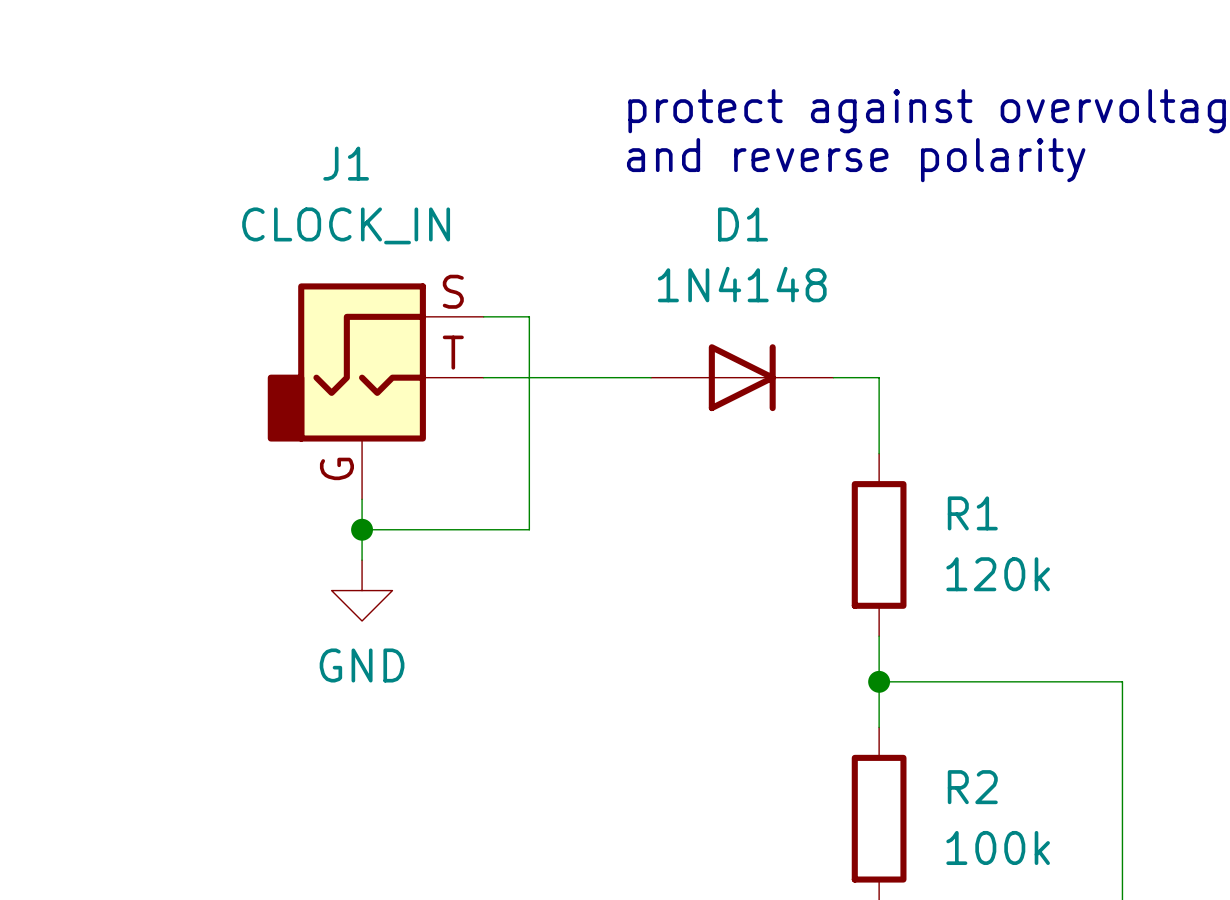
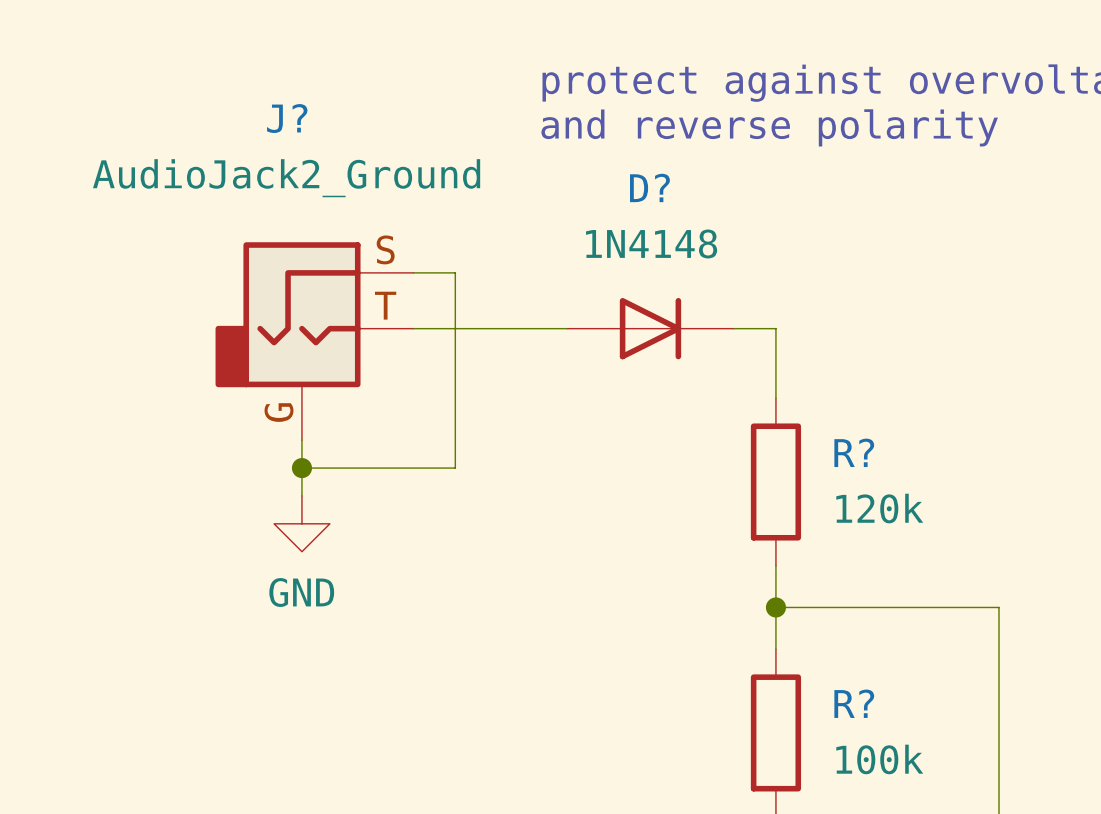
J1 name: J1 (346, 163) -> J? (287, 118)
D1 name: D1 (742, 224) -> D? (649, 187)
J1 value: CLOCK_IN (346, 225) -> AudioJack2_Ground (286, 178)
R1 name: R1 (972, 513) -> R? (854, 452)
R2 name: R2 (972, 787) -> R? (854, 703)

